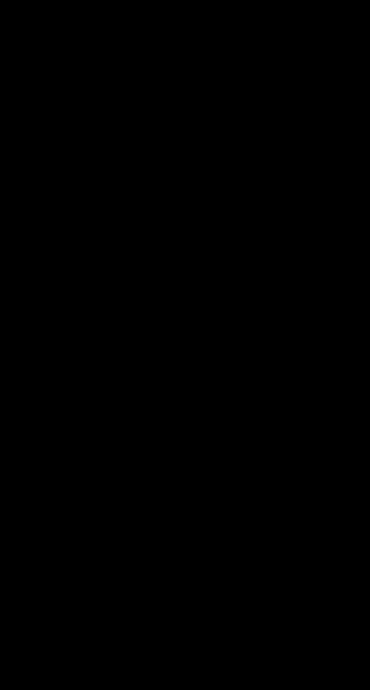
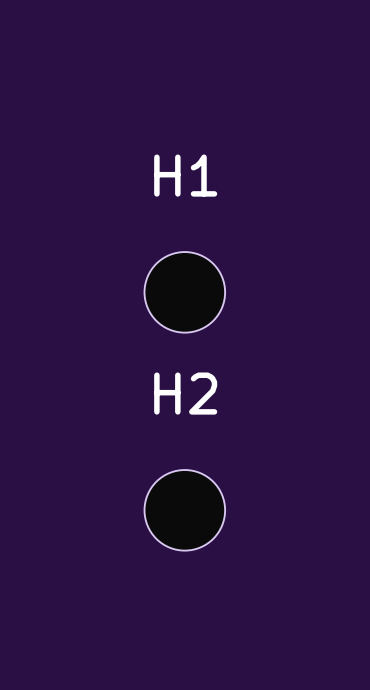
H1: none -> (184, 292)
H2: none -> (184, 510)

